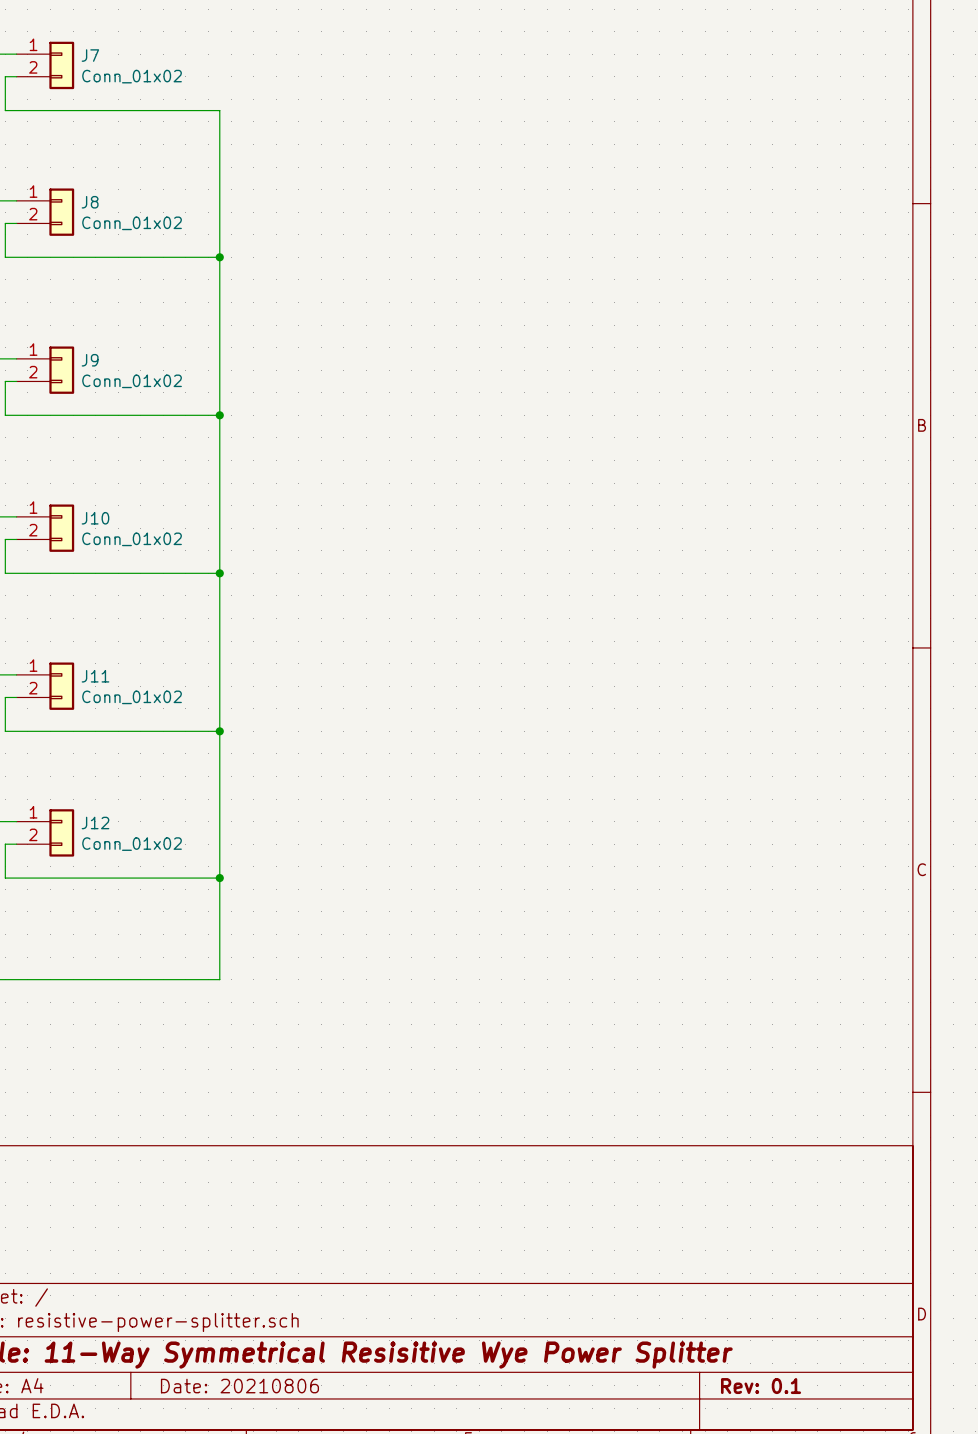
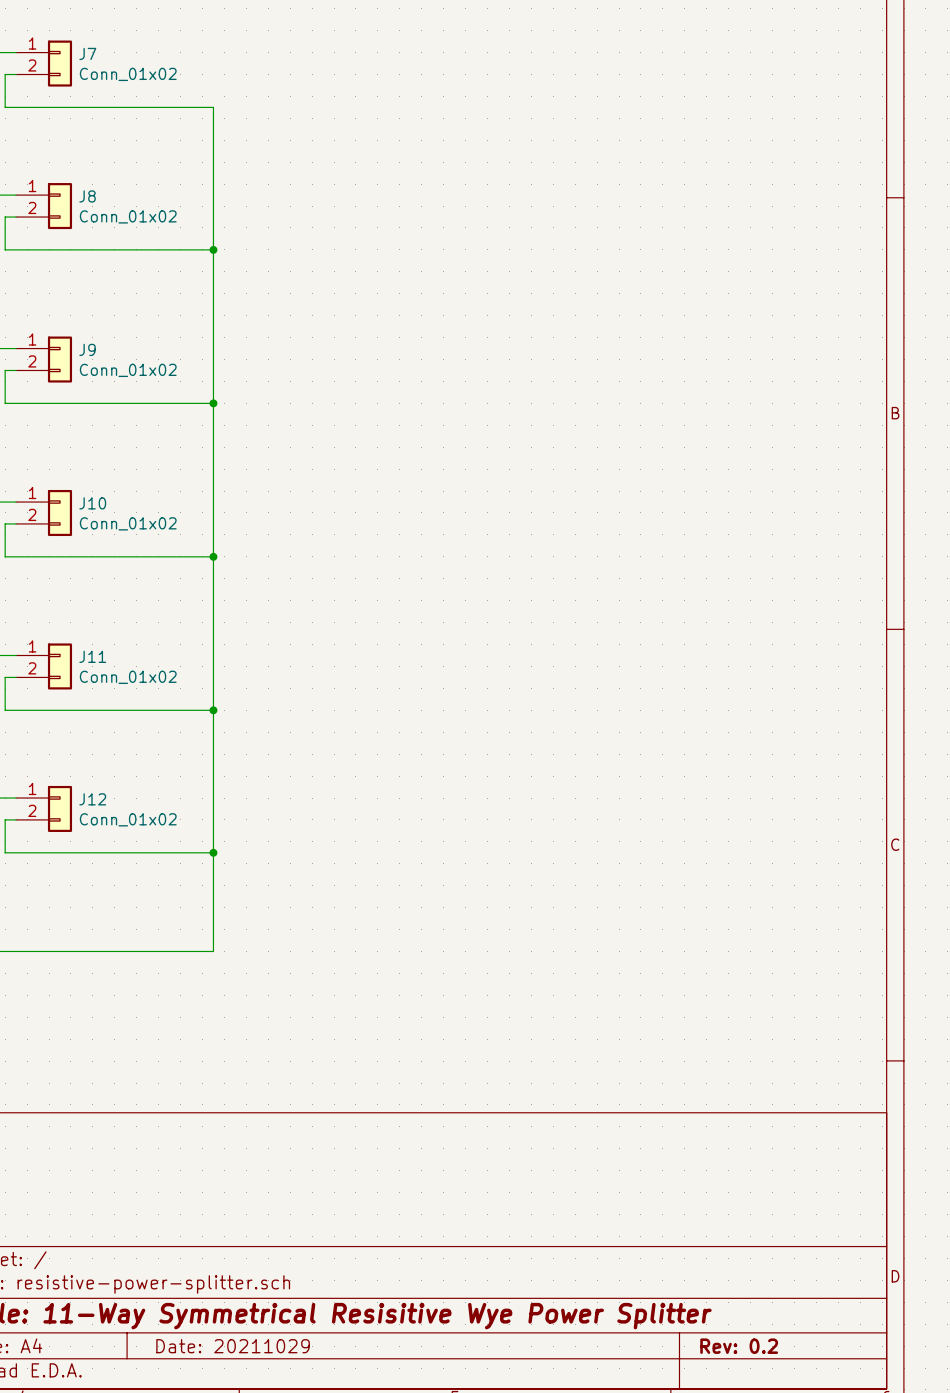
title block: Date: 20210806 (239, 1386) -> Date: 20211029 (233, 1346)
title block: Rev: 0.1 (761, 1386) -> Rev: 0.2 (739, 1346)

